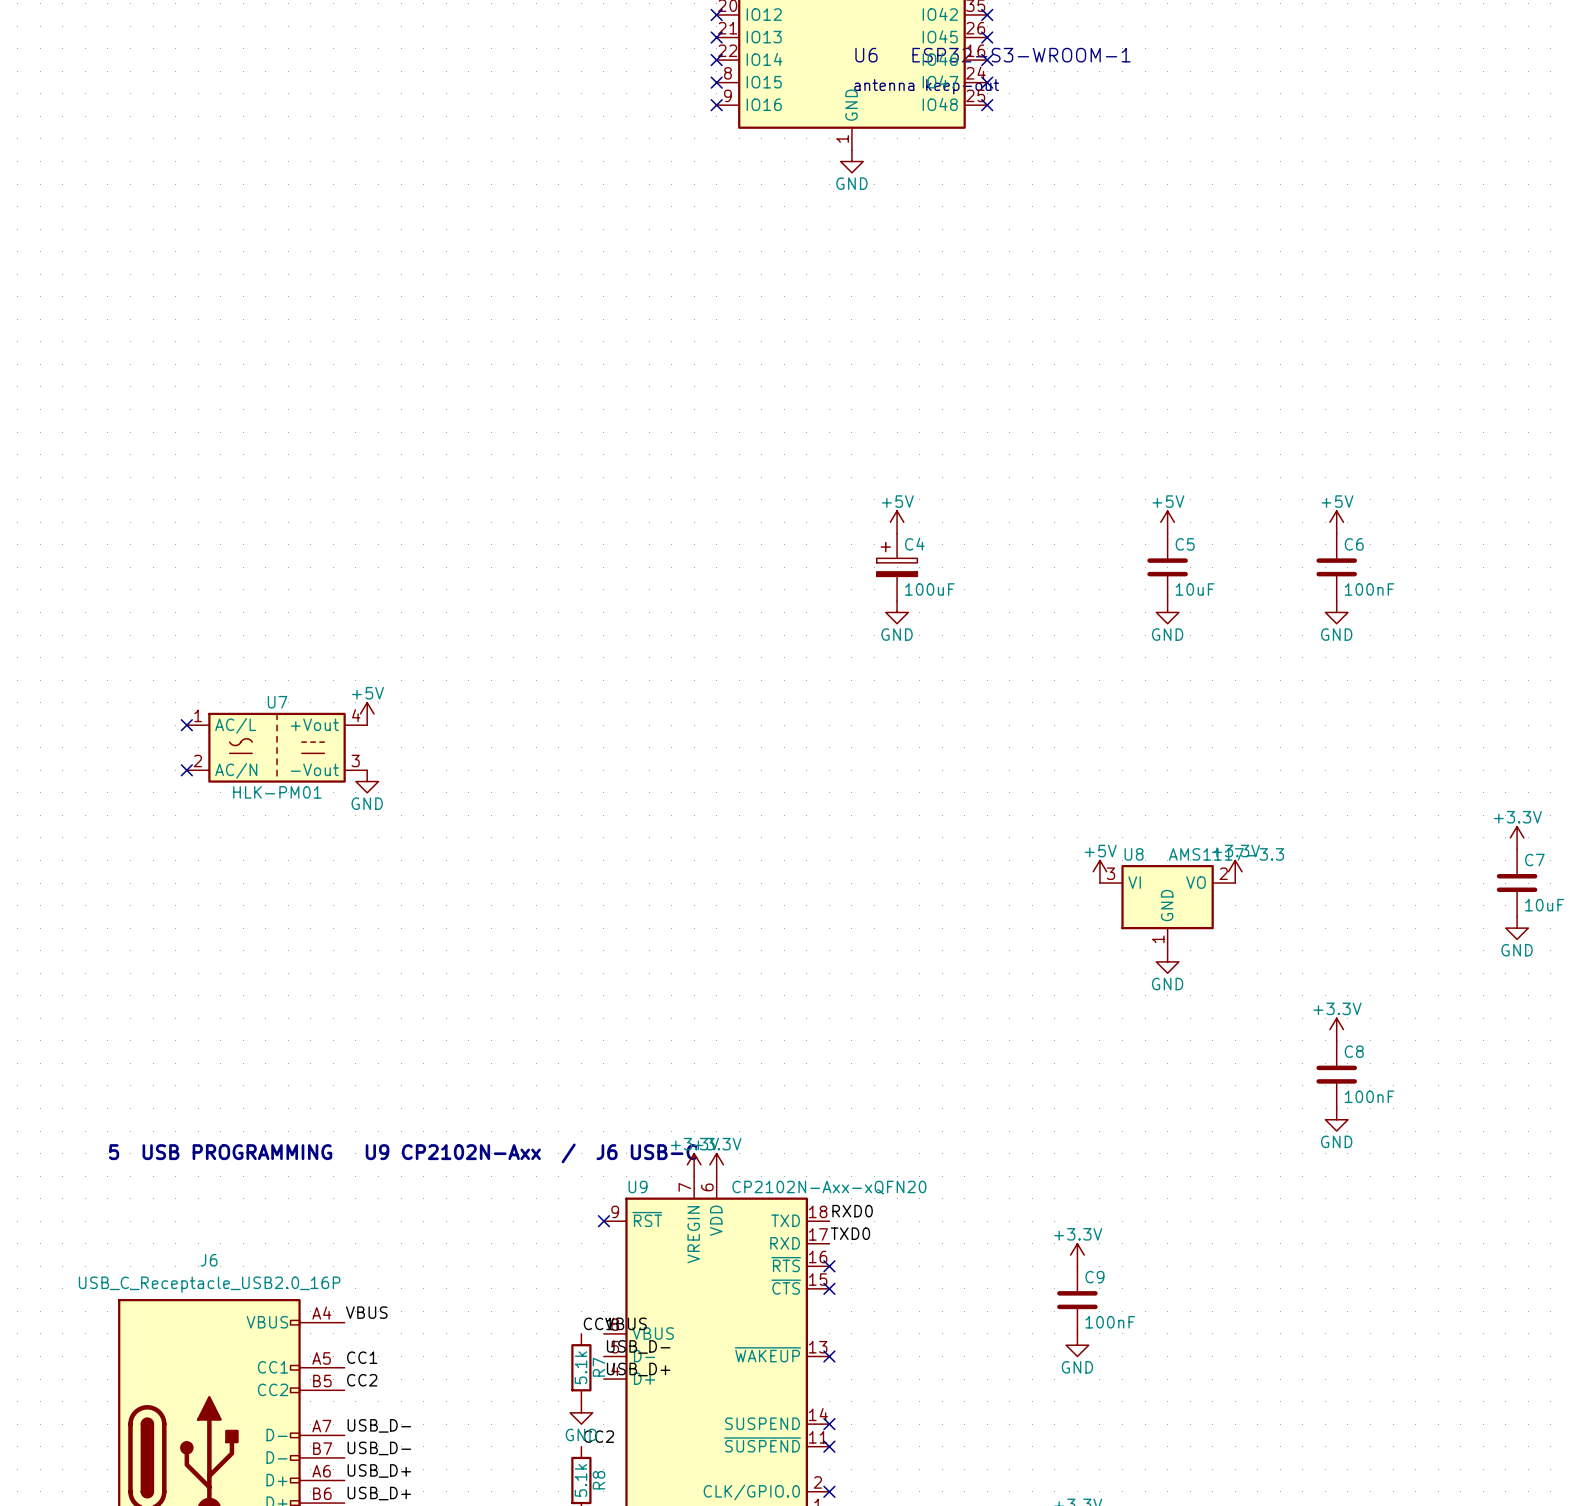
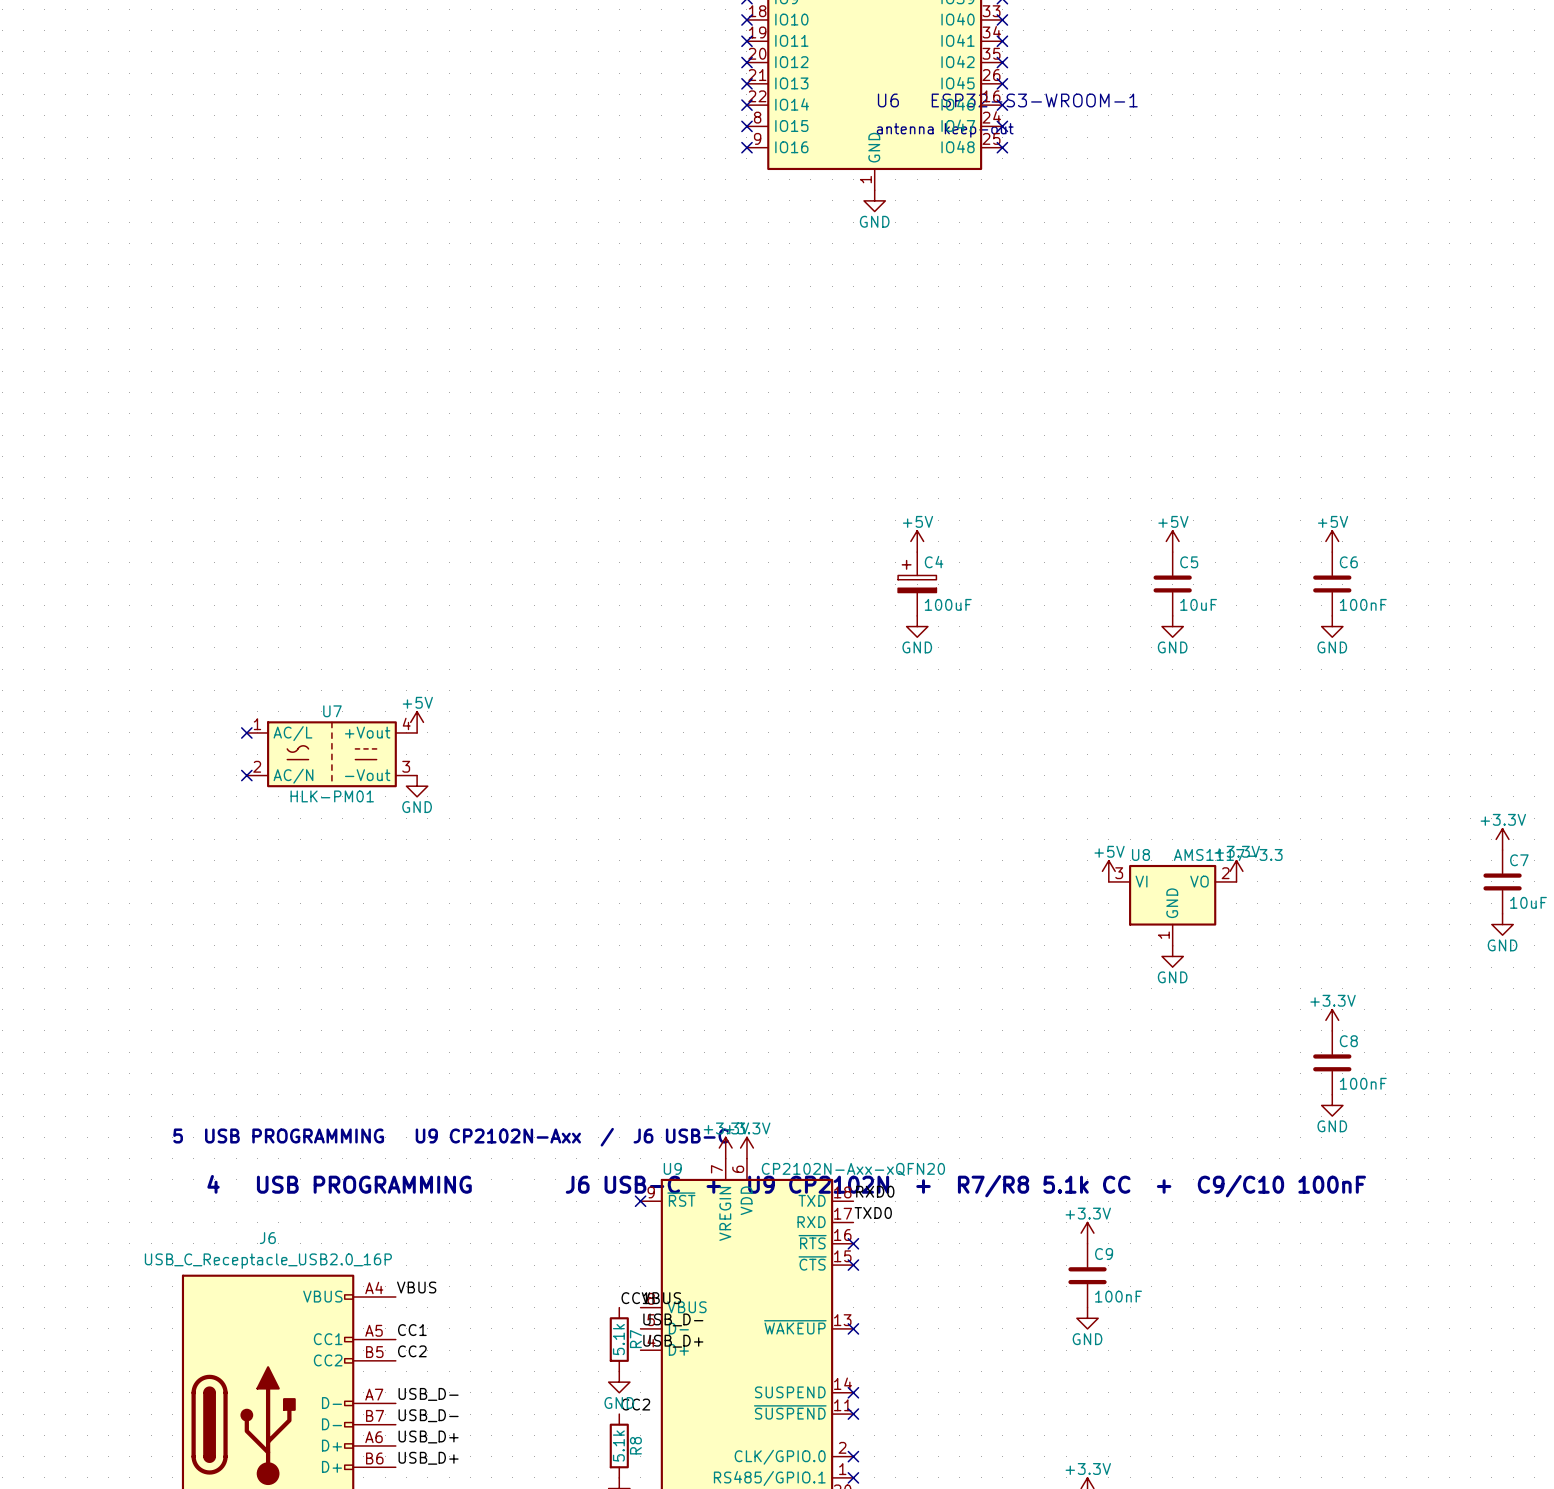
text: none -> 4 USB PROGRAMMING J6 USB-C + U9 CP2102N + R7/R8 5.1k CC + C9/C10 100nF (786, 1186)

